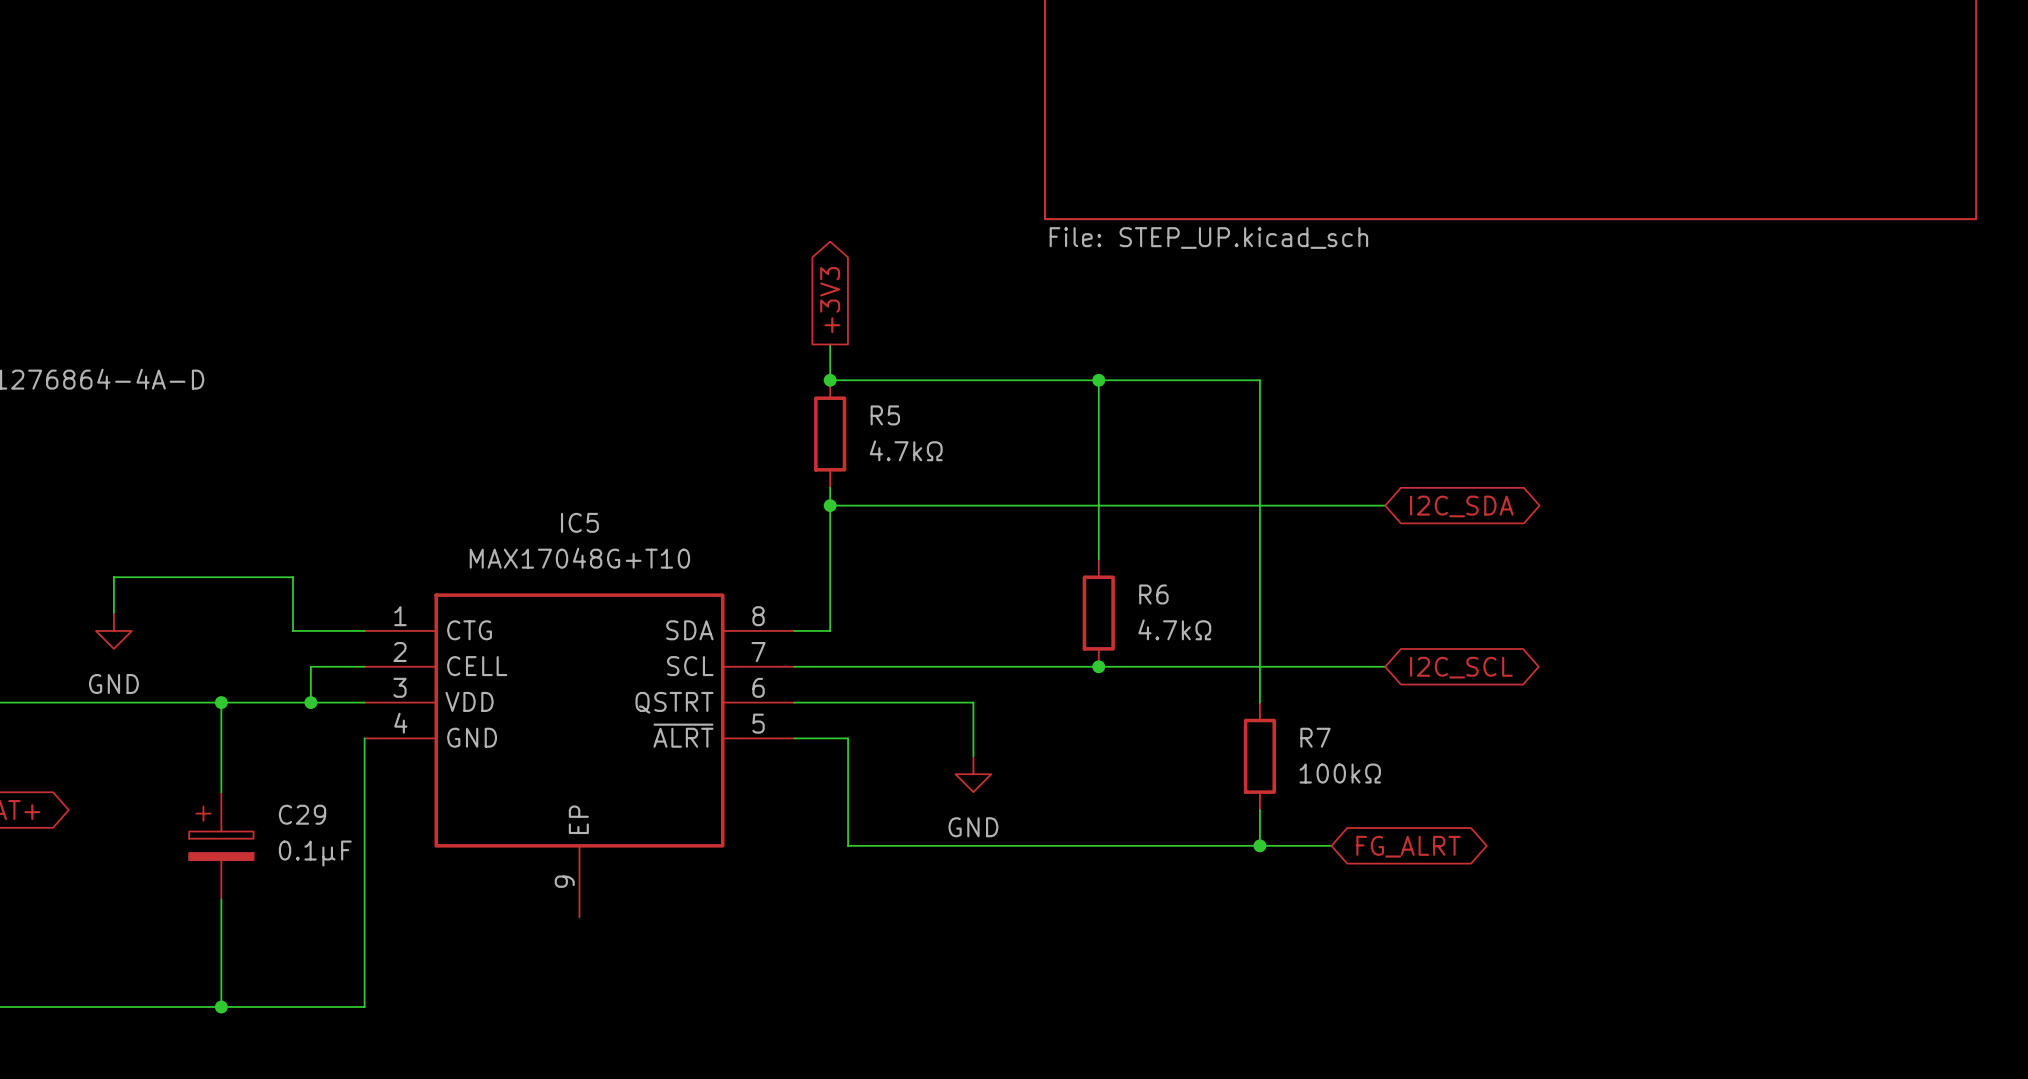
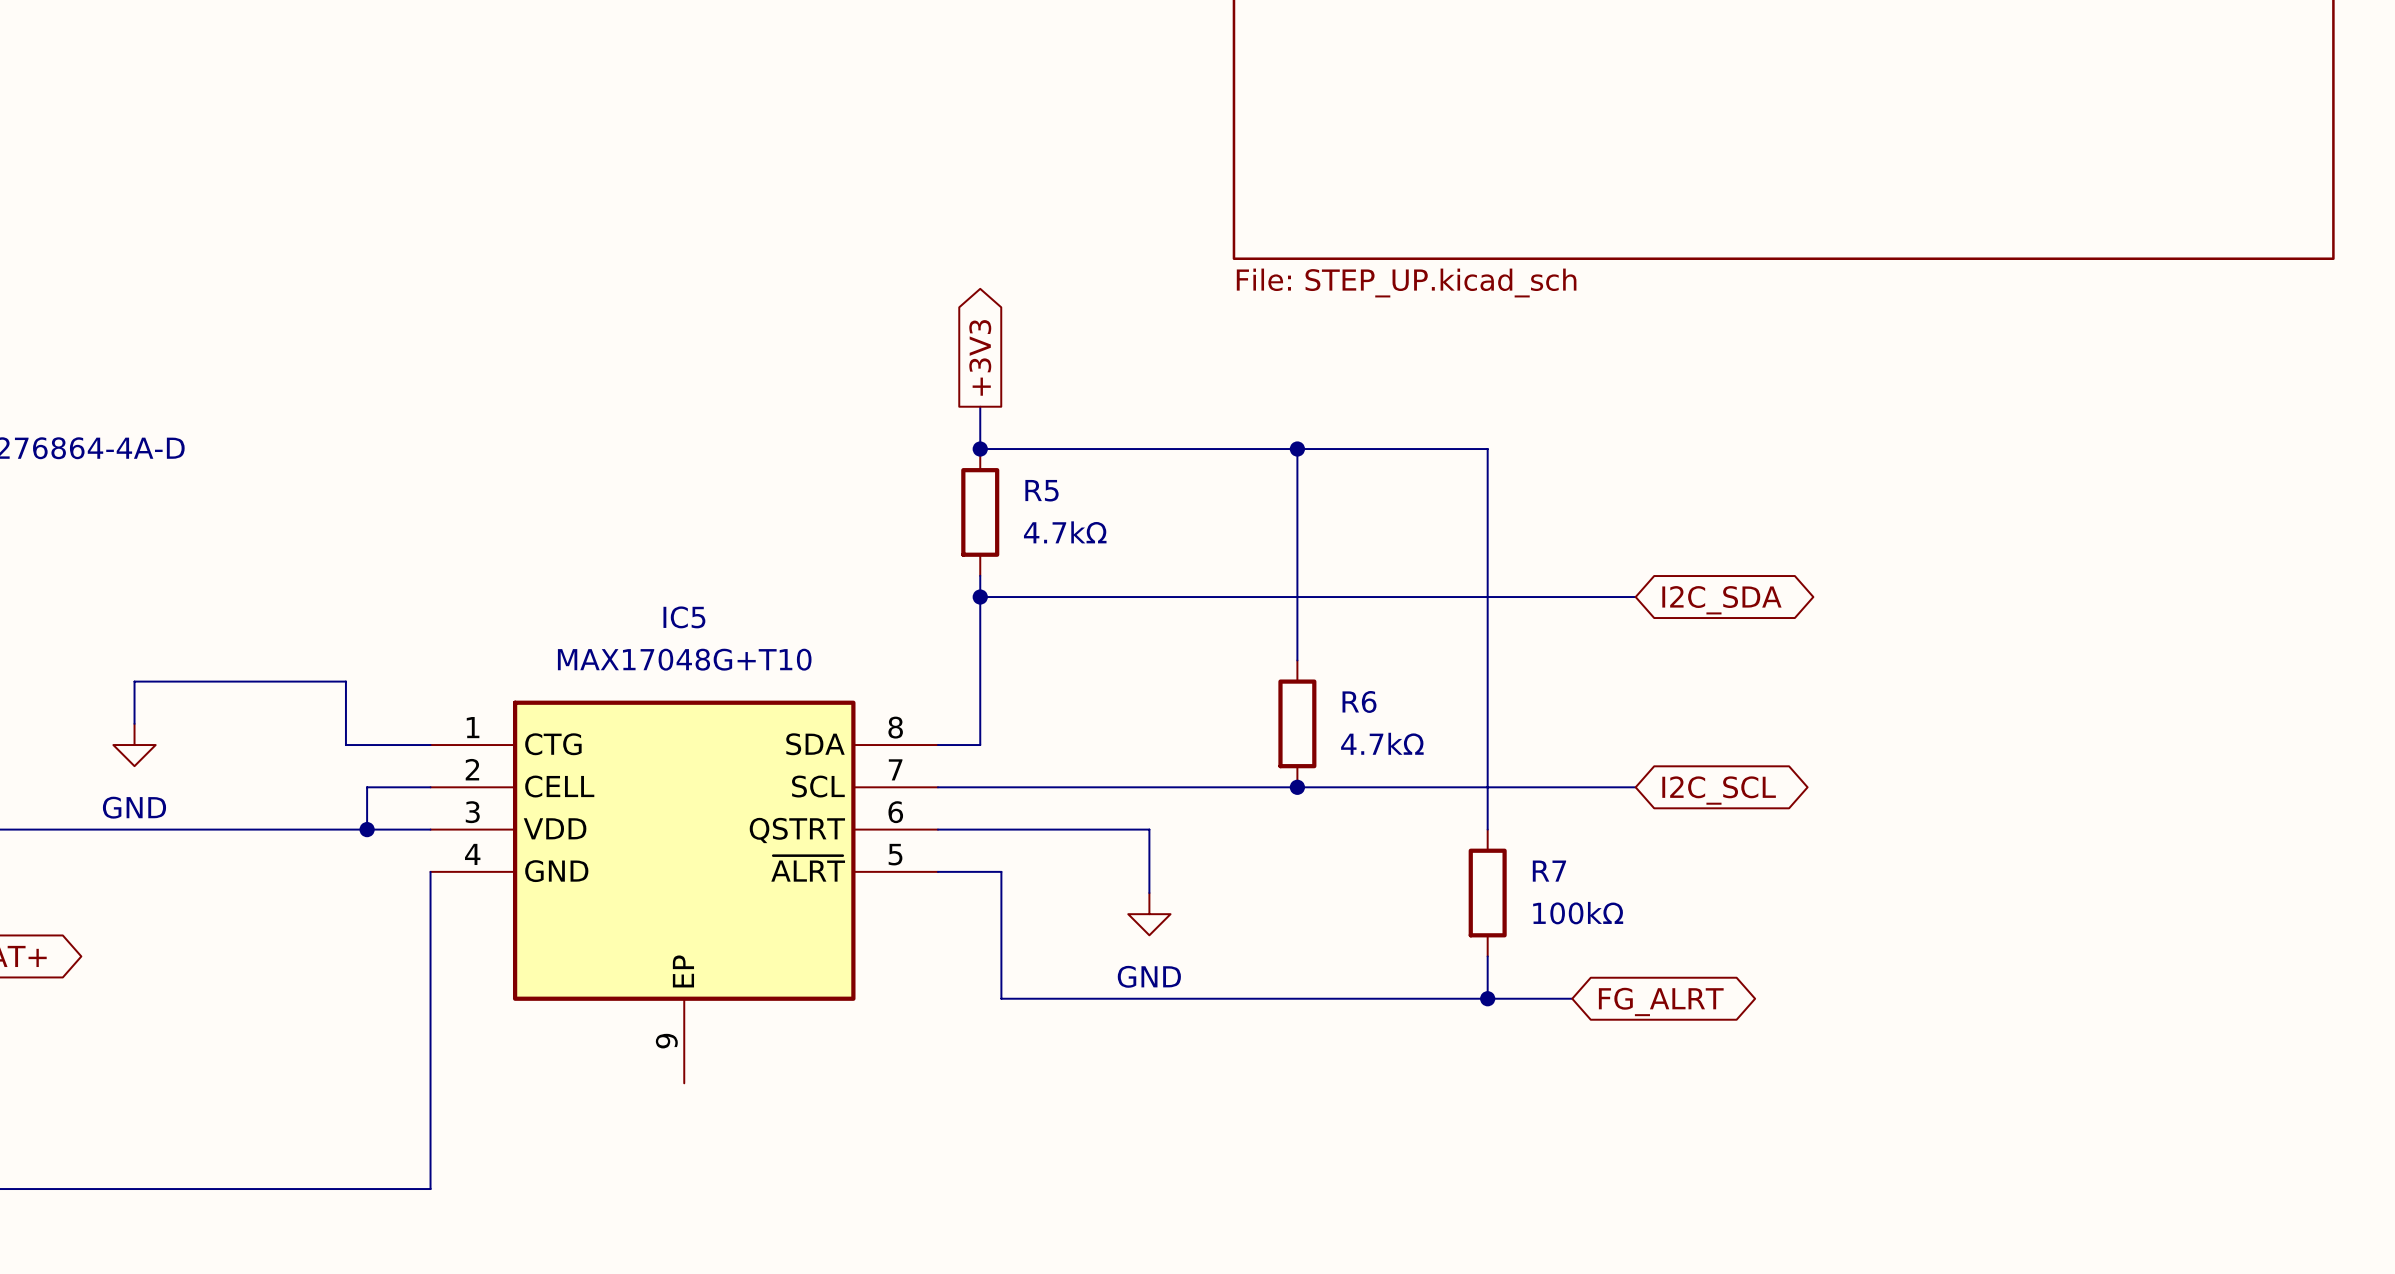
wire: (221, 702) (221, 792) -> none
junction: (221, 702) -> none
C29: 0.1µF (221, 845) -> none
wire: (221, 899) (221, 1006) -> none
junction: (221, 1006) -> none

